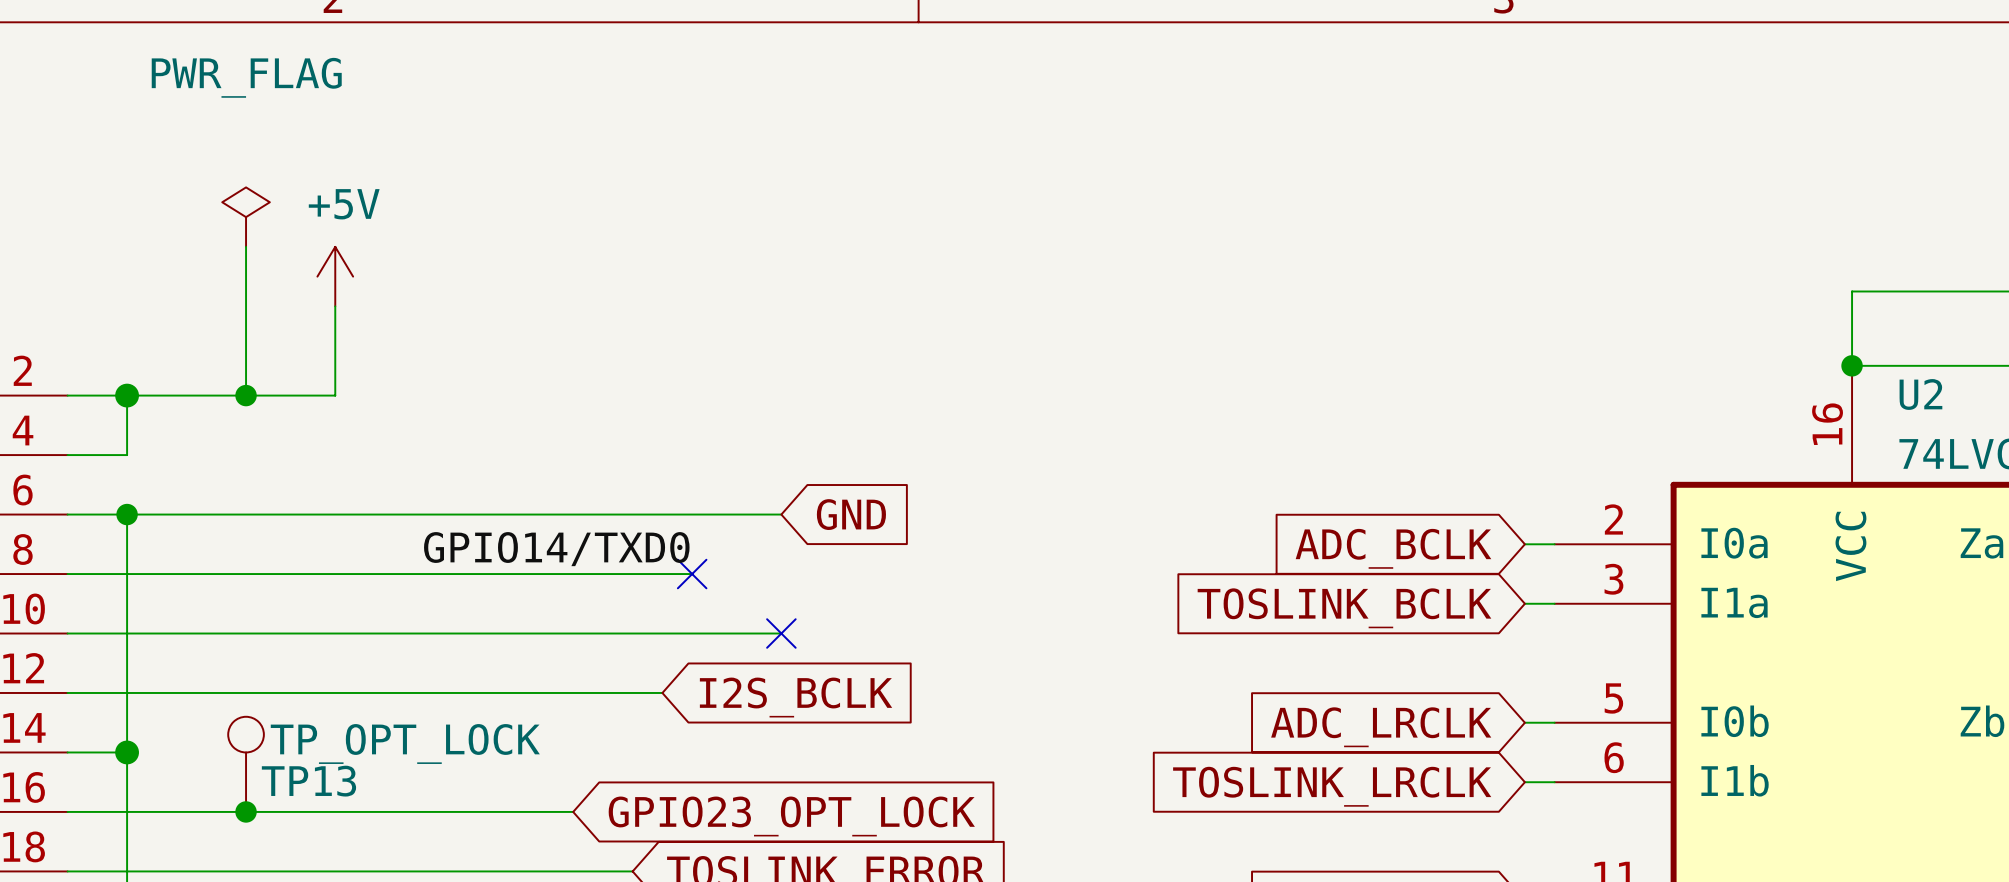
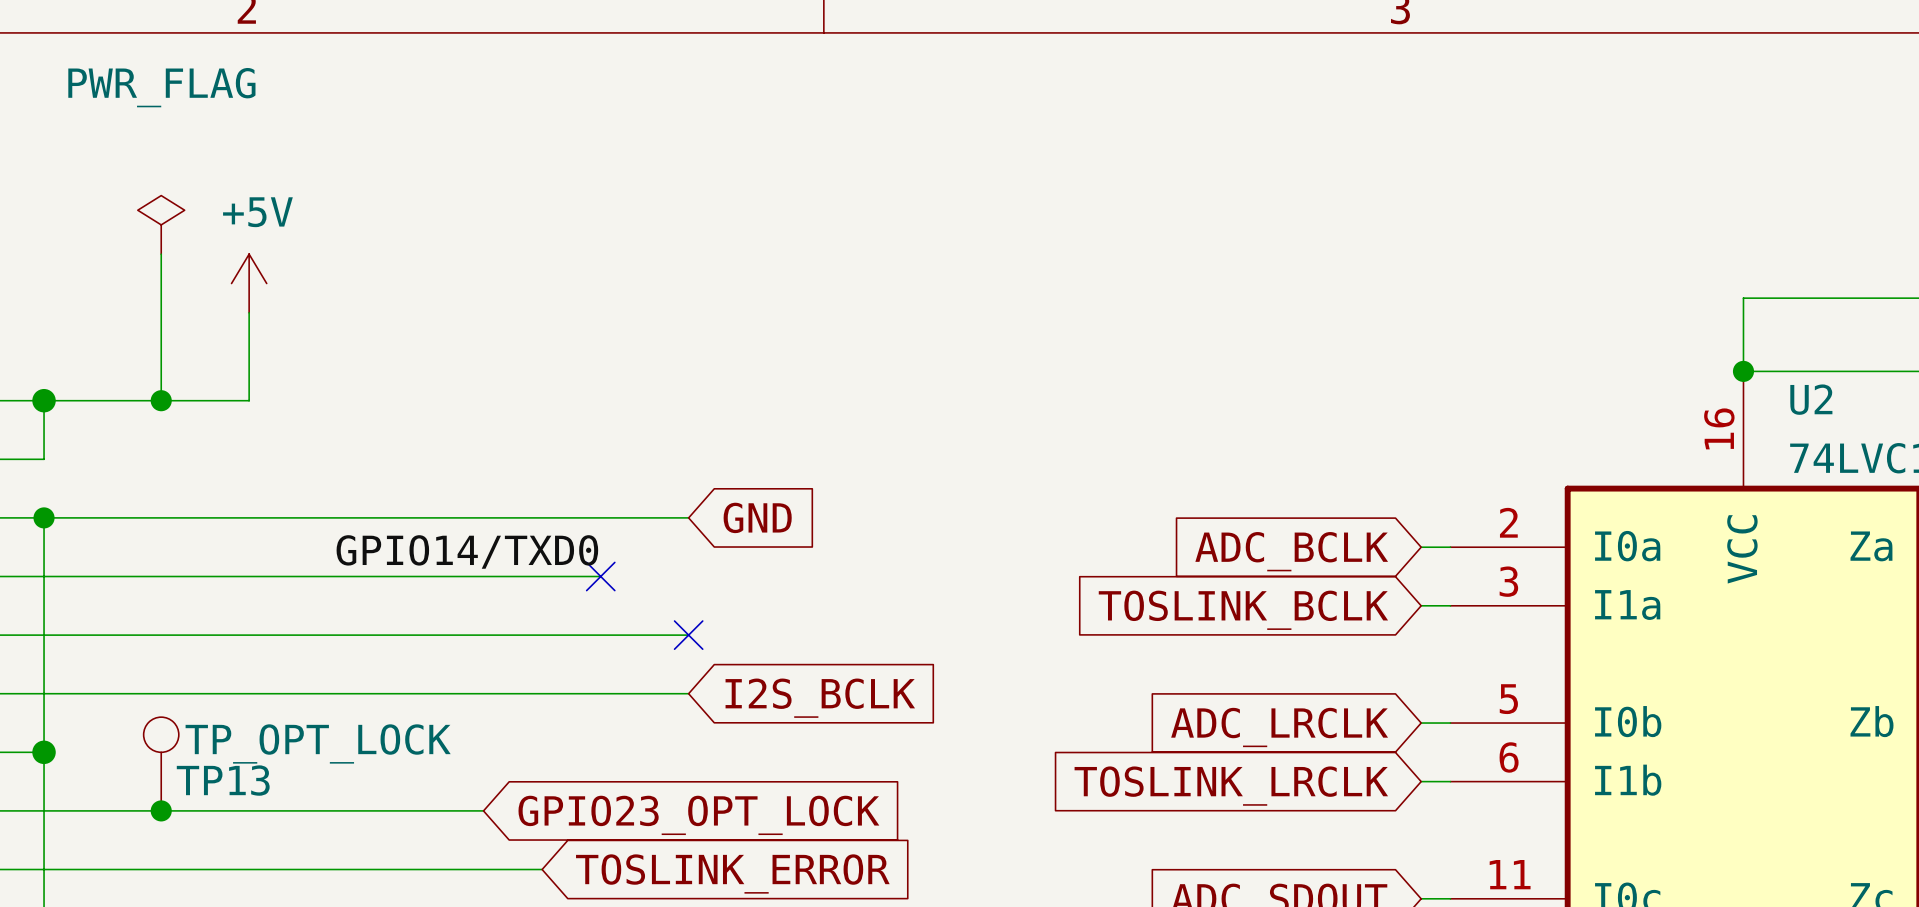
wire: none -> (571, 693) (688, 693)
global label position: I2S_BCLK (796, 697) -> I2S_BCLK (820, 698)

